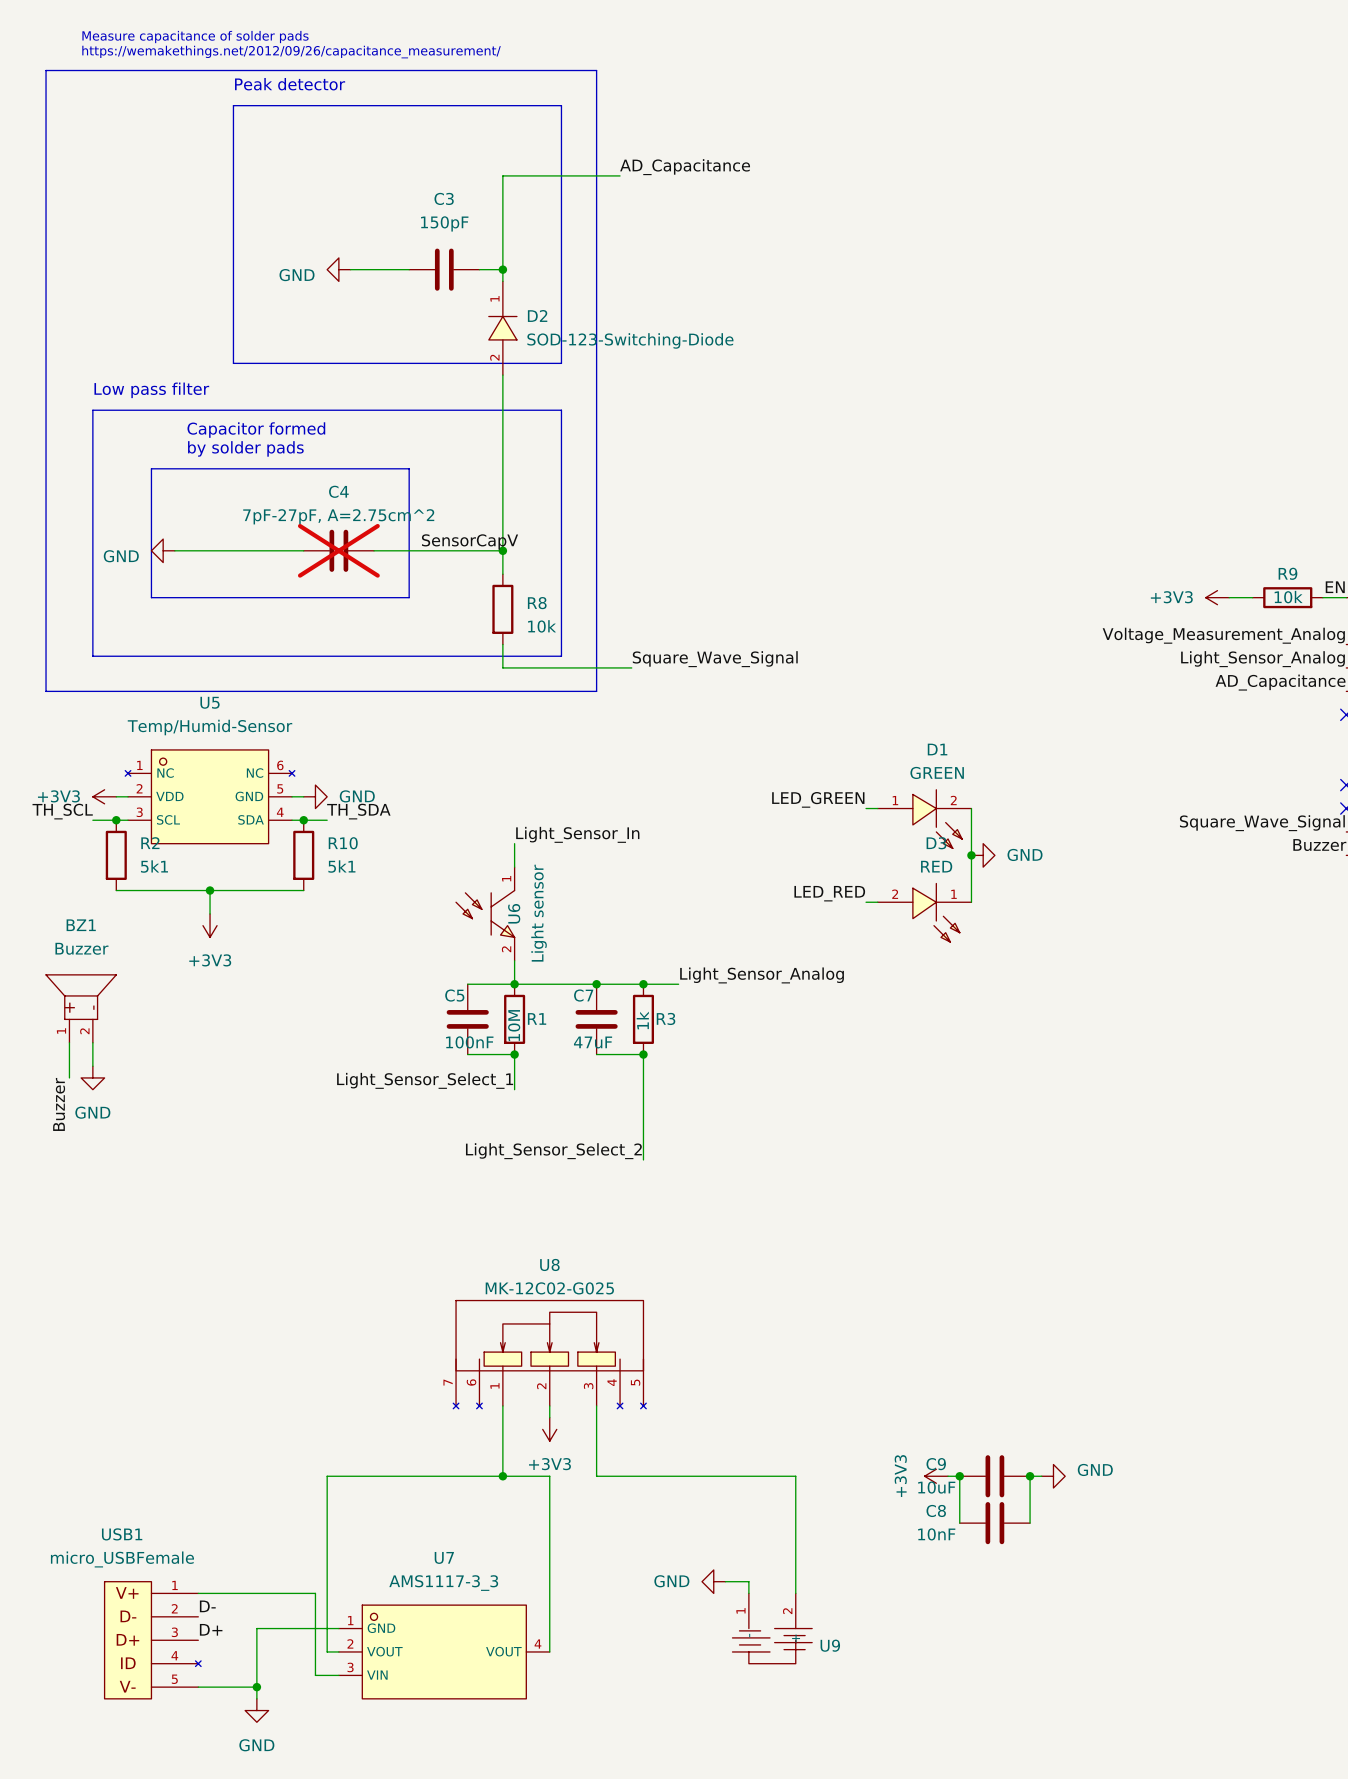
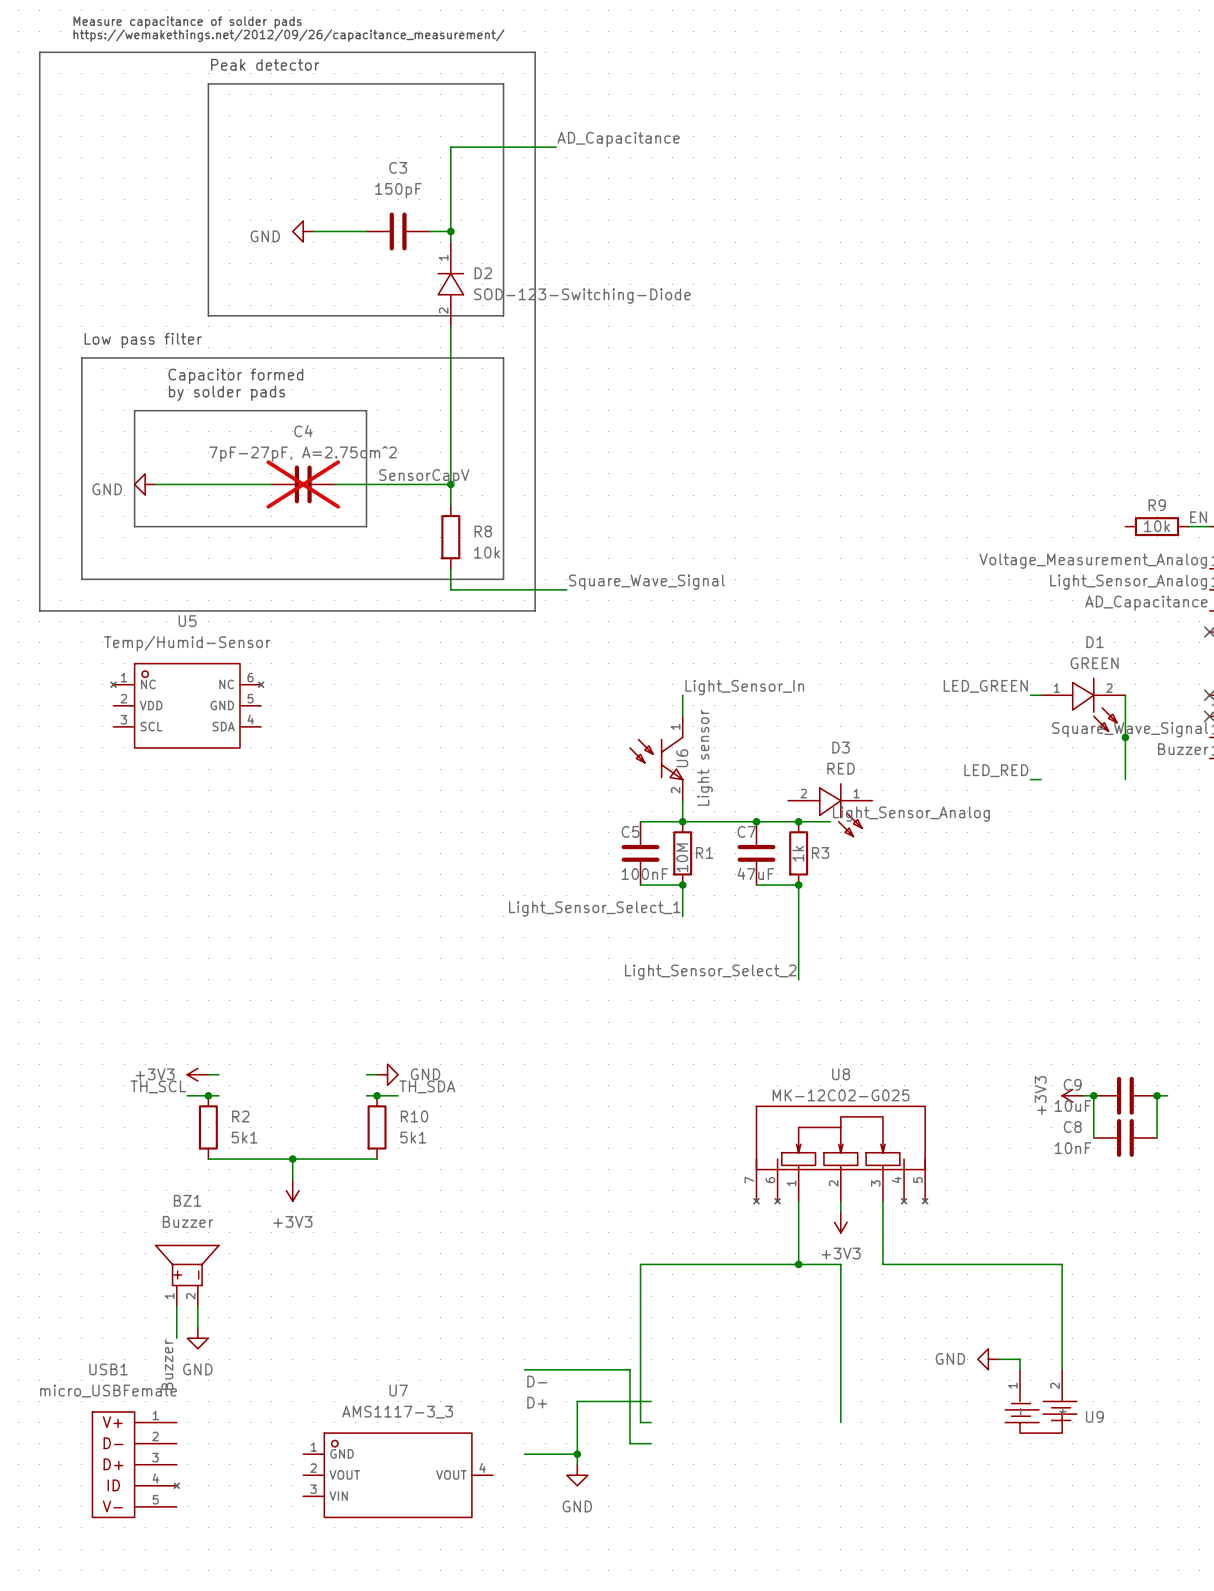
power symbol: +3V3 (1217, 597) -> none
wire: (1229, 597) (1252, 597) -> none
label: none -> Light_Sensor_In (744, 687)
label: none -> LED_GREEN (985, 686)
wire: none -> (682, 695) (682, 716)
wire: none -> (1030, 695) (1041, 695)
wire: none -> (1125, 695) (1125, 779)
power symbol: +3V3 (104, 796) -> none
wire: (116, 796) (128, 796) -> none
wire: (292, 796) (303, 796) -> none
power symbol: GND (315, 796) -> none
label: LED_GREEN (818, 799) -> none
wire: (866, 808) (877, 808) -> none
wire: (971, 808) (971, 902) -> none
label: TH_SCL (62, 811) -> none
label: TH_SDA (358, 811) -> none
D1 position: (924, 819) -> (1083, 704)
wire: (92, 820) (128, 820) -> none
junction: (116, 820) -> none
wire: (292, 820) (327, 820) -> none
junction: (303, 820) -> none
junction: none -> (1125, 737)
label: Light_Sensor_In (577, 834) -> none
wire: (514, 843) (514, 867) -> none
R2 position: (116, 855) -> (208, 1127)
R10 position: (303, 855) -> (377, 1127)
junction: (971, 855) -> none
power symbol: GND (983, 855) -> none
label: none -> LED_RED (996, 770)
wire: none -> (1030, 779) (1041, 779)
wire: (116, 890) (303, 890) -> none
wire: (210, 890) (210, 913) -> none
junction: (210, 890) -> none
label: LED_RED (829, 893) -> none
wire: none -> (682, 800) (682, 821)
wire: (866, 902) (877, 902) -> none
U6 position: (485, 913) -> (656, 758)
label: none -> Light_Sensor_Analog (911, 814)
power symbol: +3V3 (210, 925) -> none
wire: none -> (640, 821) (830, 821)
junction: none -> (682, 821)
junction: none -> (756, 821)
junction: none -> (798, 821)
wire: (514, 960) (514, 984) -> none
label: Light_Sensor_Analog (762, 975) -> none
wire: (467, 984) (678, 984) -> none
junction: (514, 984) -> none
junction: (596, 984) -> none
junction: (643, 984) -> none
wire: none -> (640, 885) (682, 885) (682, 916)
junction: none -> (682, 885)
wire: none -> (756, 885) (798, 885) (798, 979)
junction: none -> (798, 885)
BZ1 position: (81, 1008) -> (187, 1276)
C5 position: (467, 1019) -> (640, 853)
R1 position: (514, 1019) -> (682, 853)
C7 position: (596, 1019) -> (756, 853)
R3 position: (643, 1019) -> (798, 853)
label: none -> Light_Sensor_Select_1 (594, 908)
wire: (69, 1042) (69, 1077) -> none
wire: (92, 1042) (92, 1066) -> none
wire: (467, 1054) (514, 1054) (514, 1089) -> none
junction: (514, 1054) -> none
wire: (596, 1054) (643, 1054) (643, 1159) -> none
junction: (643, 1054) -> none
power symbol: GND (92, 1077) -> none
label: Light_Sensor_Select_1 (425, 1080) -> none
label: none -> Light_Sensor_Select_2 (710, 972)
label: Buzzer (59, 1104) -> none
label: Light_Sensor_Select_2 (553, 1151) -> none
power symbol: none -> +3V3 (197, 1074)
wire: none -> (208, 1074) (218, 1074)
wire: none -> (366, 1074) (377, 1074)
power symbol: none -> GND (387, 1074)
label: none -> TH_SCL (158, 1086)
label: none -> TH_SDA (427, 1086)
wire: none -> (187, 1095) (218, 1095)
junction: none -> (208, 1095)
wire: none -> (366, 1095) (398, 1095)
junction: none -> (377, 1095)
power symbol: none -> +3V3 (1072, 1095)
wire: none -> (1083, 1095) (1093, 1095) (1093, 1137)
junction: none -> (1093, 1095)
junction: none -> (1157, 1095)
wire: none -> (1167, 1095) (1157, 1095) (1157, 1137)
wire: none -> (208, 1159) (377, 1159)
wire: none -> (292, 1159) (292, 1180)
junction: none -> (292, 1159)
power symbol: none -> +3V3 (292, 1190)
wire: none -> (798, 1201) (798, 1264)
wire: none -> (840, 1201) (840, 1211)
wire: none -> (882, 1201) (882, 1264) (1062, 1264) (1062, 1369)
U8 position: (549, 1354) -> (840, 1155)
wire: (502, 1405) (502, 1476) -> none
wire: (549, 1405) (549, 1417) -> none
wire: (596, 1405) (596, 1476) (795, 1476) (795, 1593) -> none
junction: none -> (798, 1264)
power symbol: +3V3 (549, 1429) -> none
wire: none -> (176, 1306) (176, 1338)
wire: none -> (197, 1306) (197, 1327)
junction: (502, 1476) -> none
power symbol rotation: 0° (936, 1476) -> 90° counterclockwise (840, 1222)
power symbol position: +3V3 (936, 1476) -> +3V3 (840, 1222)
wire: (948, 1476) (959, 1476) (959, 1523) -> none
junction: (959, 1476) -> none
C9 position: (994, 1476) -> (1125, 1095)
junction: (1030, 1476) -> none
wire: (1041, 1476) (1030, 1476) (1030, 1523) -> none
power symbol rotation: 0° (1053, 1476) -> 180° (988, 1359)
power symbol position: GND (1053, 1476) -> GND (988, 1359)
power symbol: none -> GND (197, 1338)
C8 position: (994, 1523) -> (1125, 1137)
wire: none -> (998, 1359) (1020, 1359) (1020, 1369)
label: none -> Buzzer (167, 1364)
wire: none -> (524, 1369) (630, 1369) (630, 1443) (651, 1443)
label: none -> D- (537, 1381)
wire: none -> (651, 1401) (577, 1401) (577, 1464)
label: none -> D+ (537, 1402)
power symbol rotation: 0° (713, 1581) -> 90° counterclockwise (577, 1475)
power symbol position: GND (713, 1581) -> GND (577, 1475)
wire: (725, 1581) (748, 1581) (748, 1593) -> none
wire: (198, 1593) (315, 1593) (315, 1675) (338, 1675) -> none
wire: none -> (651, 1422) (640, 1422) (640, 1264) (840, 1264) (840, 1422)
label: D- (207, 1606) -> none
wire: (338, 1628) (256, 1628) (256, 1698) -> none
wire: none -> (524, 1454) (577, 1454)
junction: none -> (577, 1454)
U9 position: (772, 1628) -> (1041, 1401)
label: D+ (211, 1629) -> none
wire: (338, 1651) (327, 1651) (327, 1476) (549, 1476) (549, 1651) -> none
wire: (198, 1687) (256, 1687) -> none
junction: (256, 1687) -> none
power symbol: GND (256, 1710) -> none

